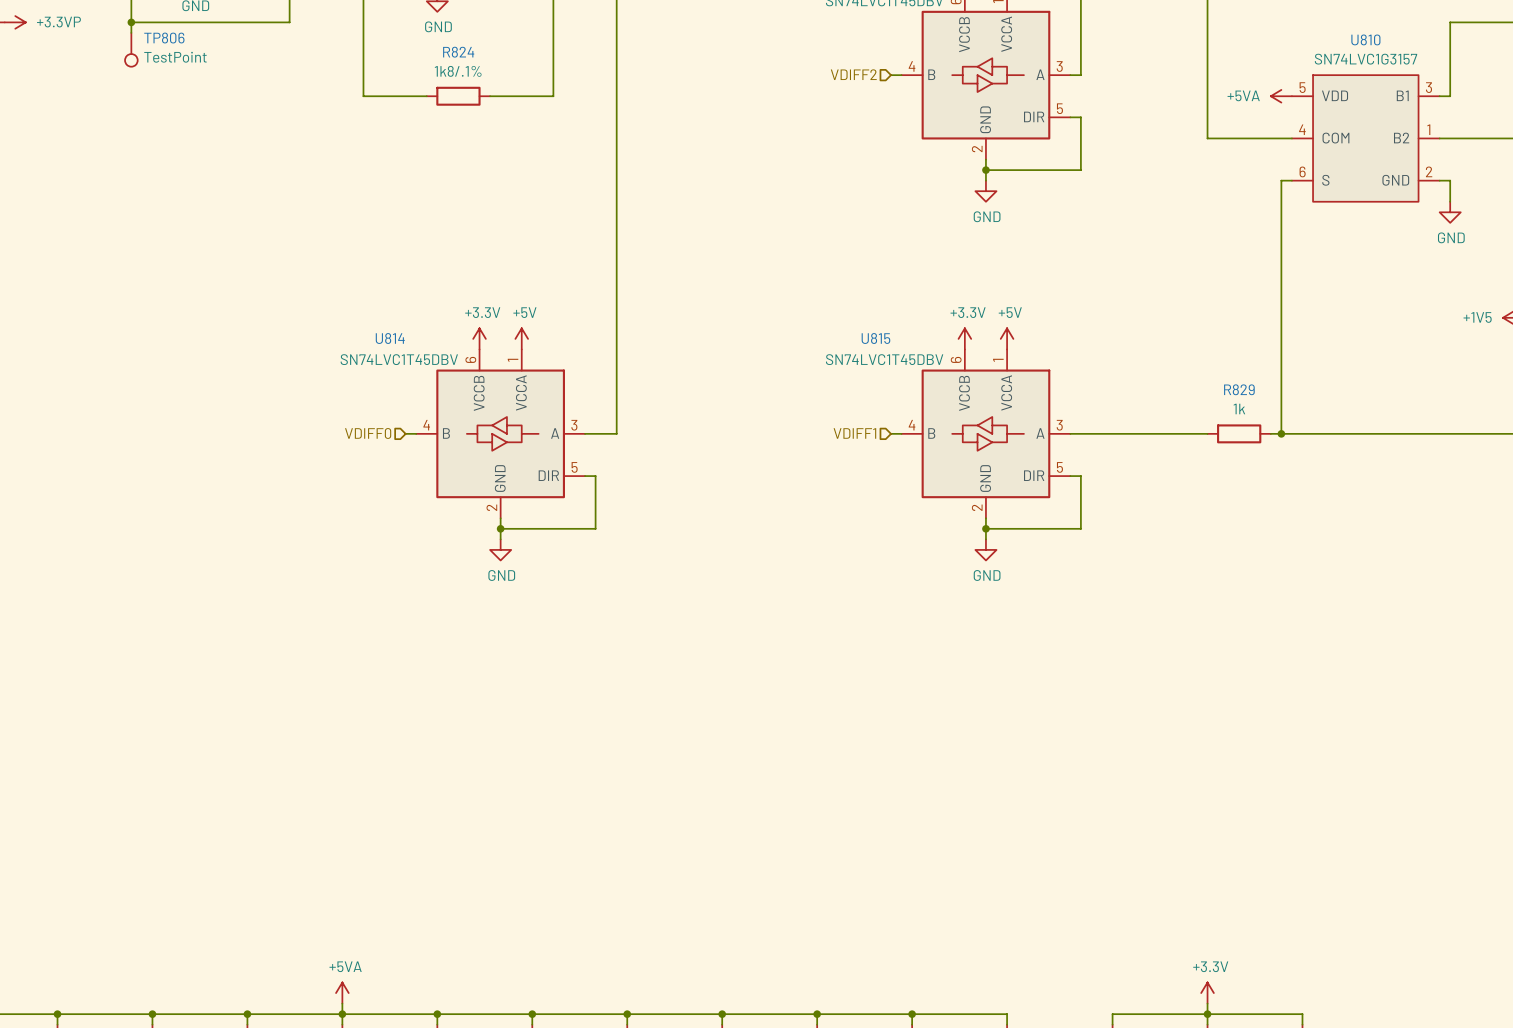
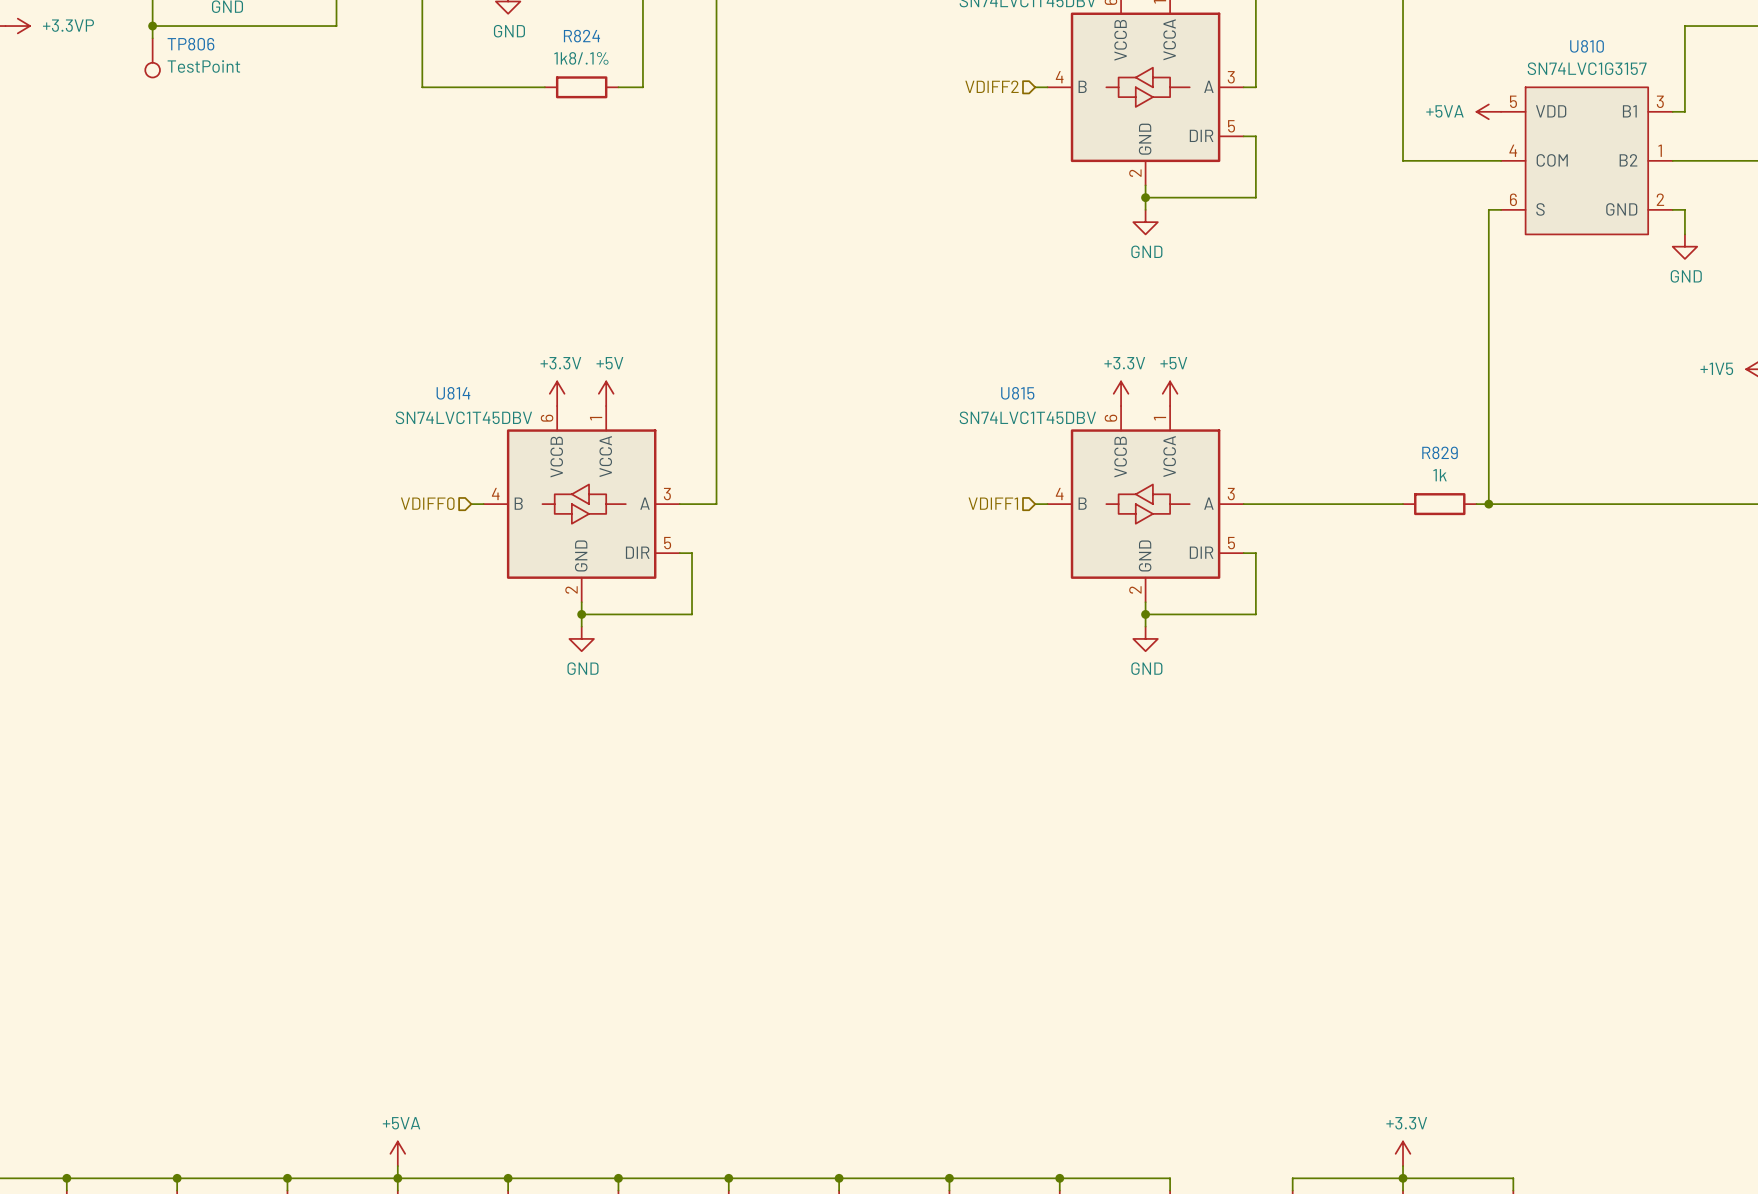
wire: (363, 75) (363, 96) (426, 96) -> (422, 87) (544, 87)
wire: (553, 75) (553, 96) (490, 96) -> (642, 87) (618, 87)
R824 position: (458, 96) -> (581, 87)

